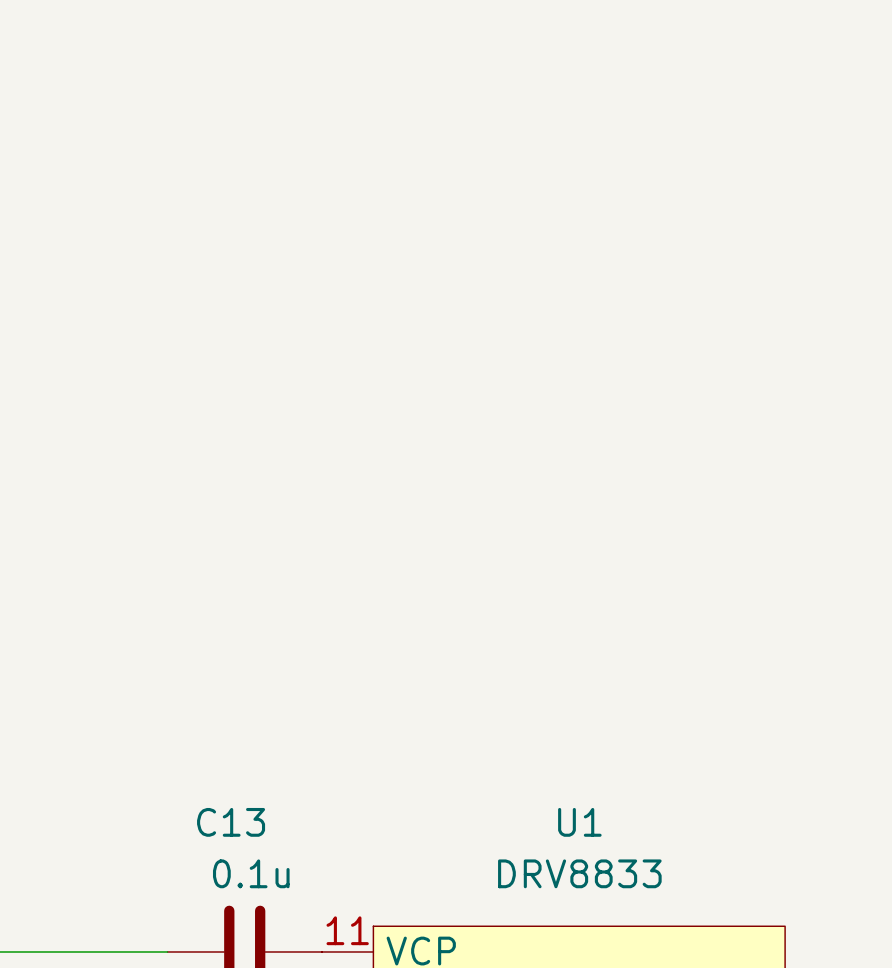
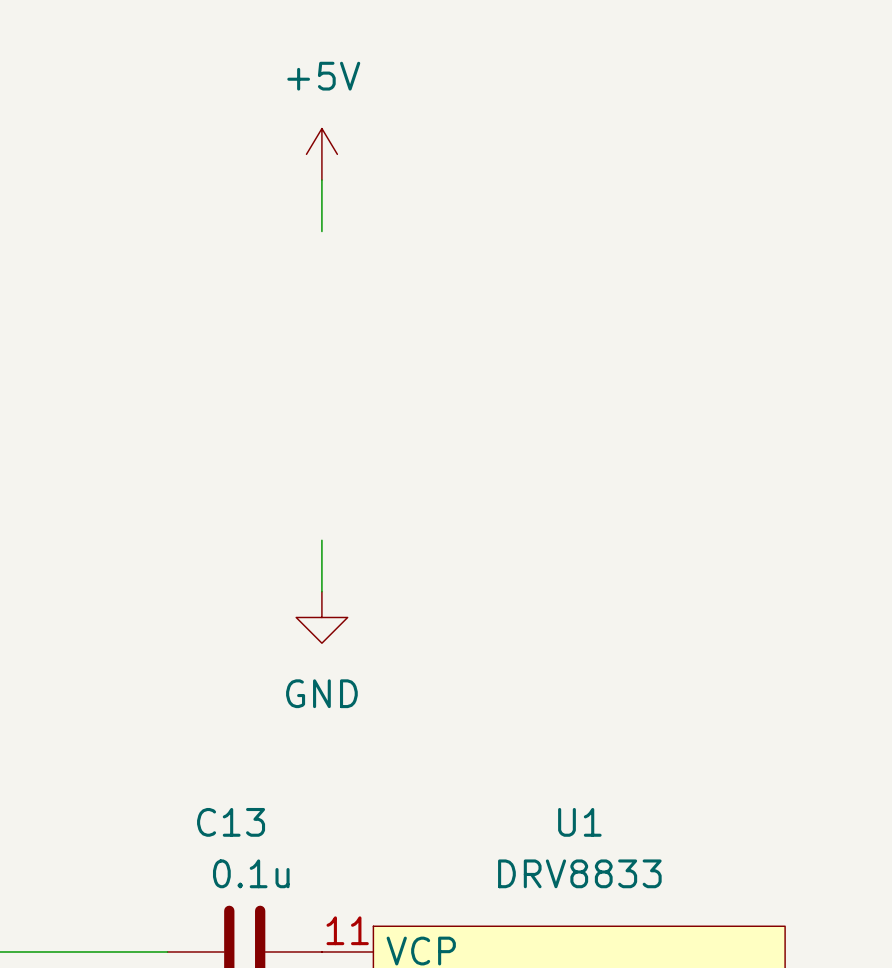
power symbol: none -> +5V (321, 154)
wire: none -> (321, 180) (321, 231)
wire: none -> (321, 540) (321, 591)
power symbol: none -> GND (321, 617)

